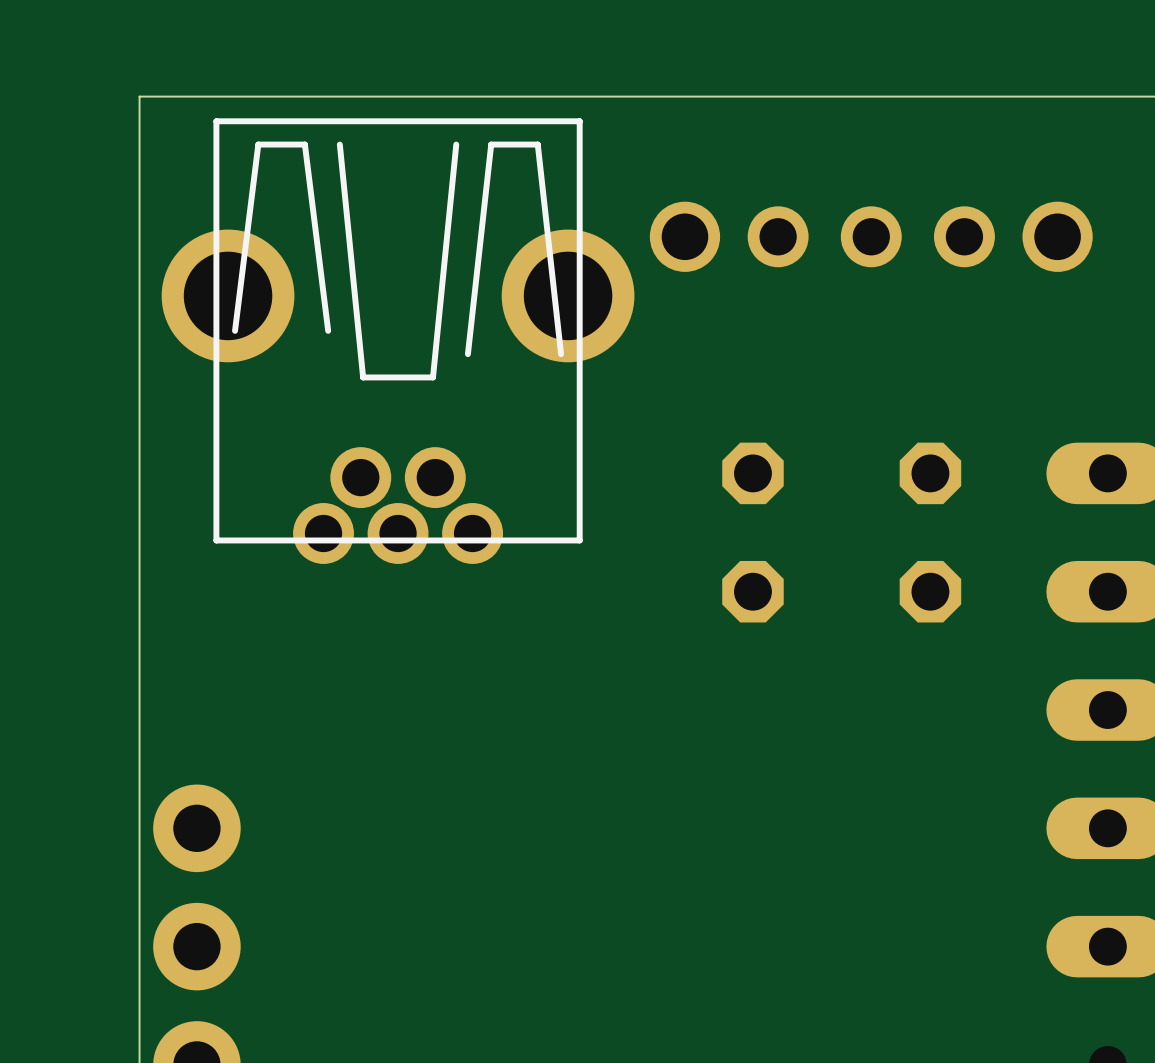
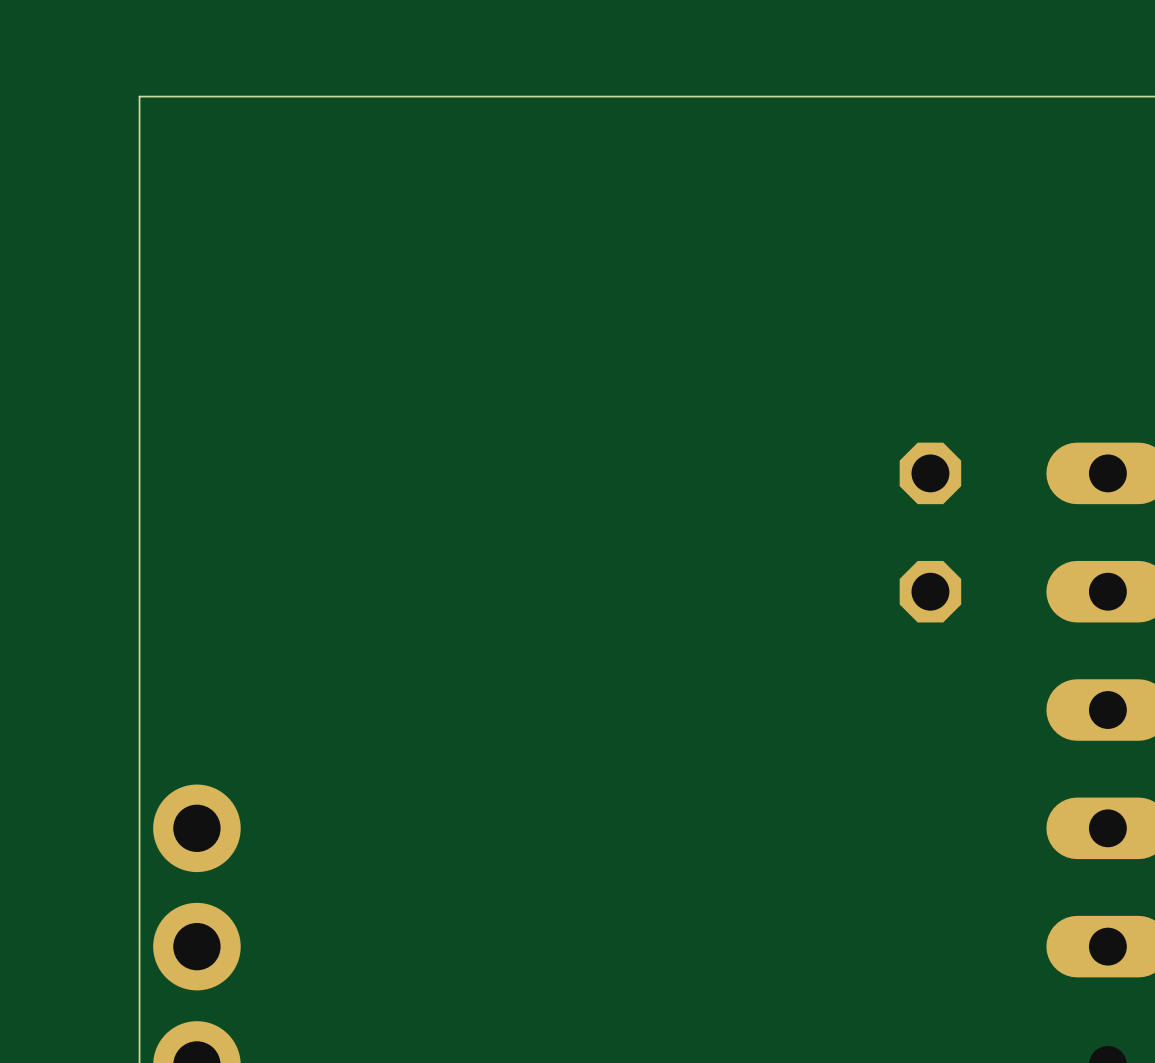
part: (871, 236) -> none
part: (398, 341) -> none
part: (752, 532) -> none

